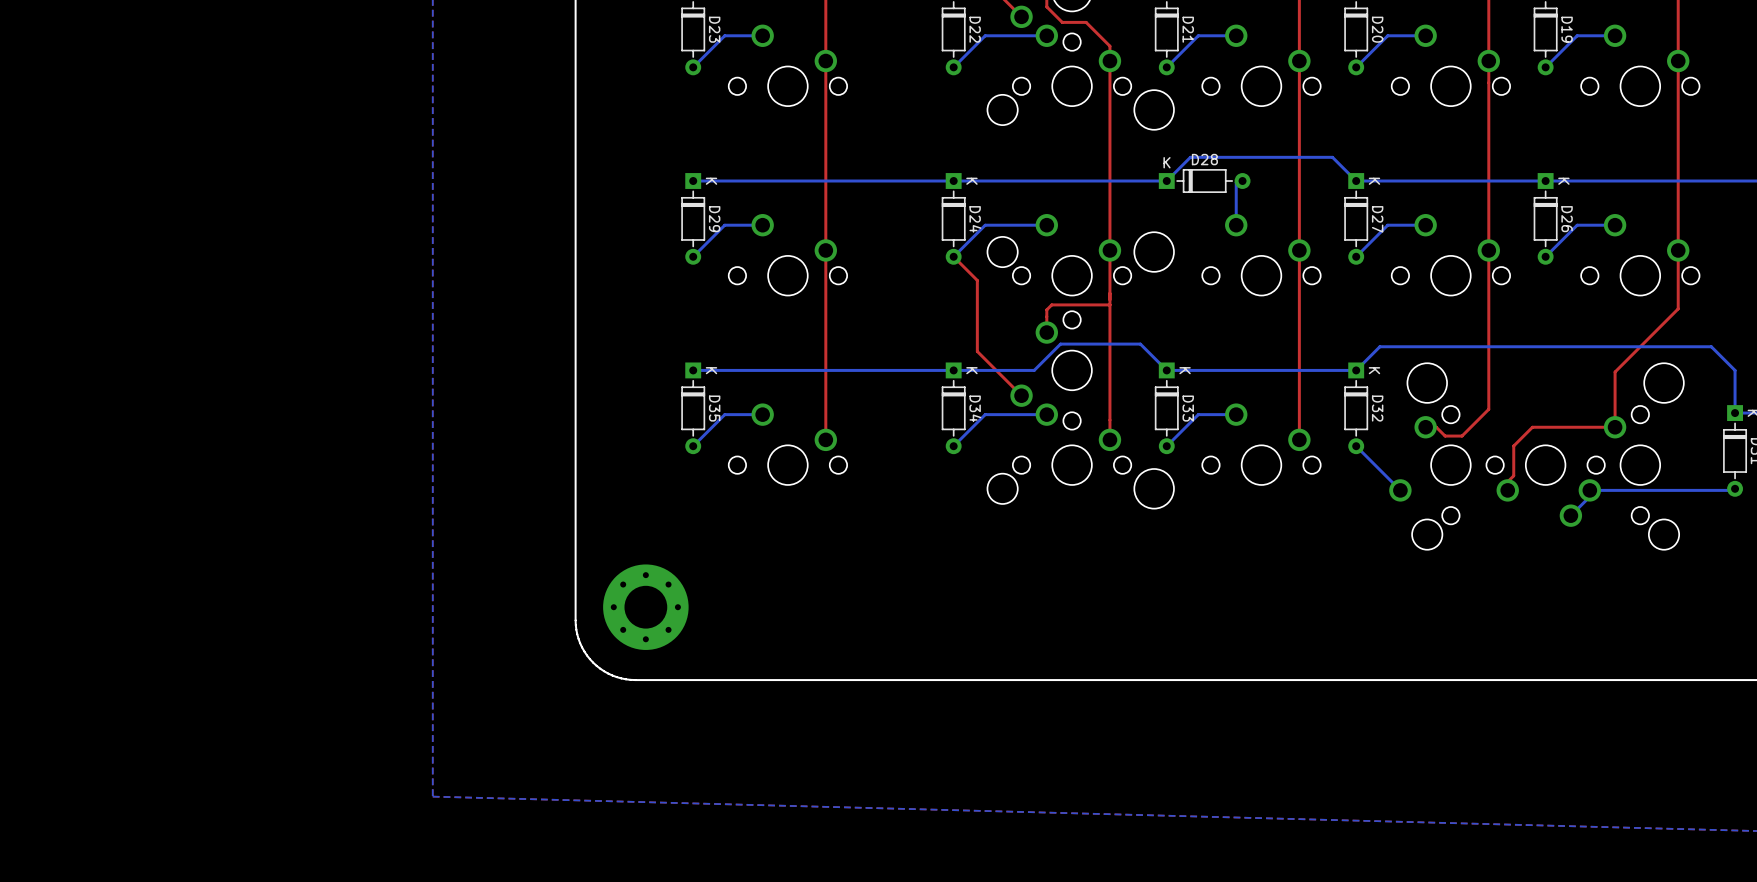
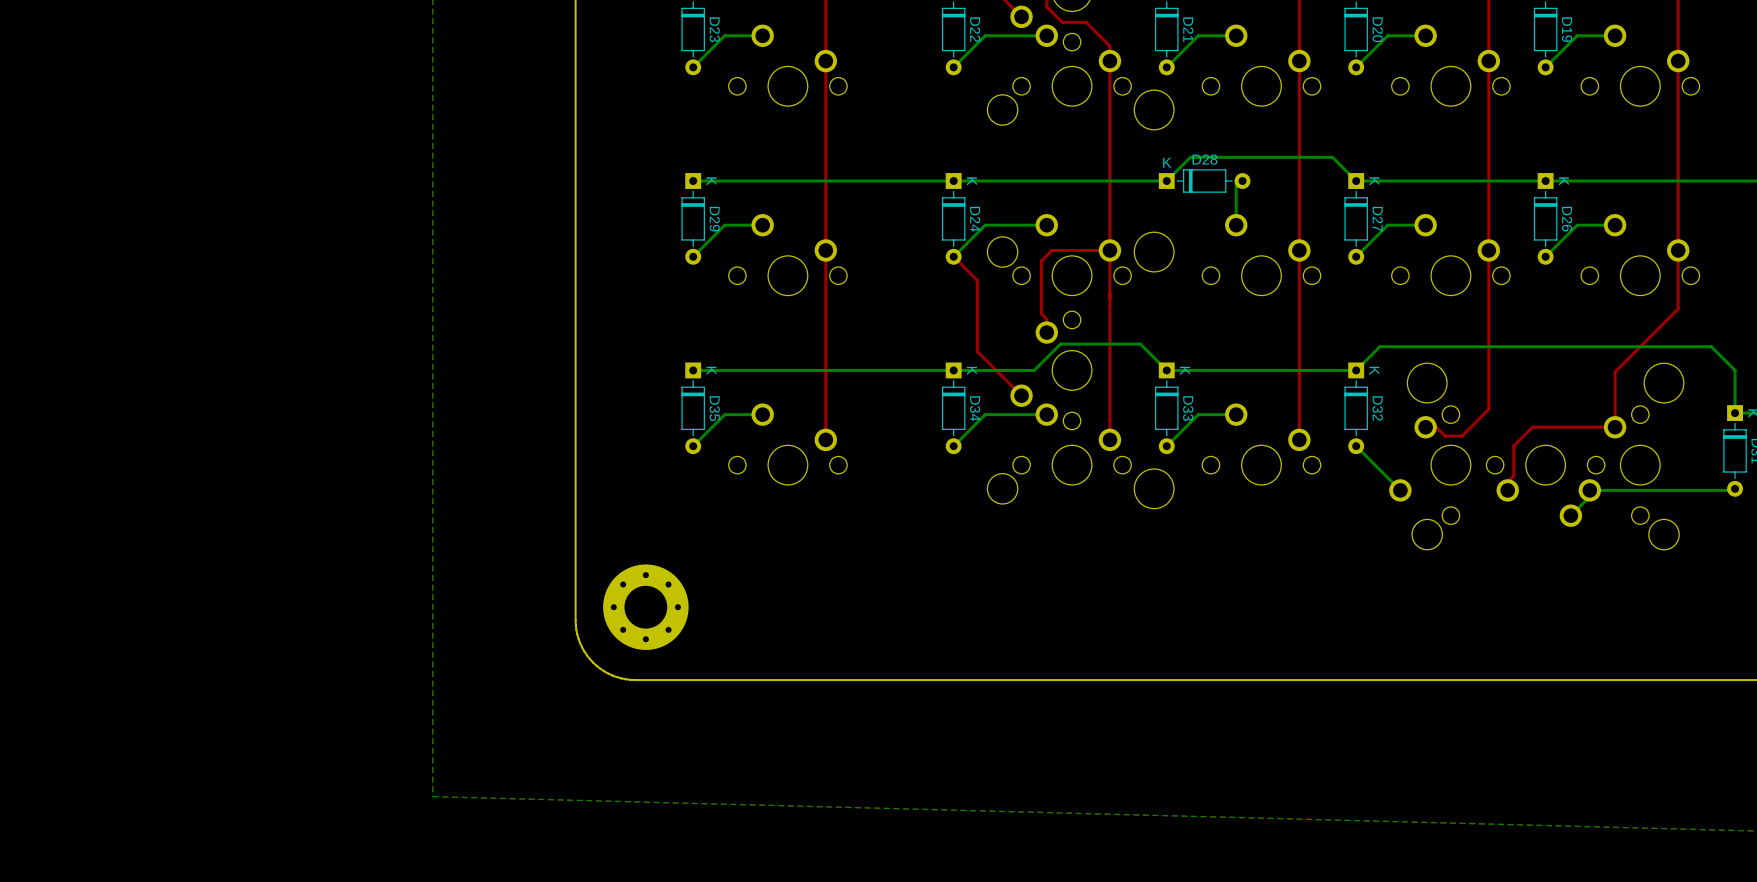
top track: (1109, 304) (1051, 304) (1046, 309) (1046, 319) -> (1109, 250) (1052, 250) (1041, 261) (1041, 313) (1046, 319)

